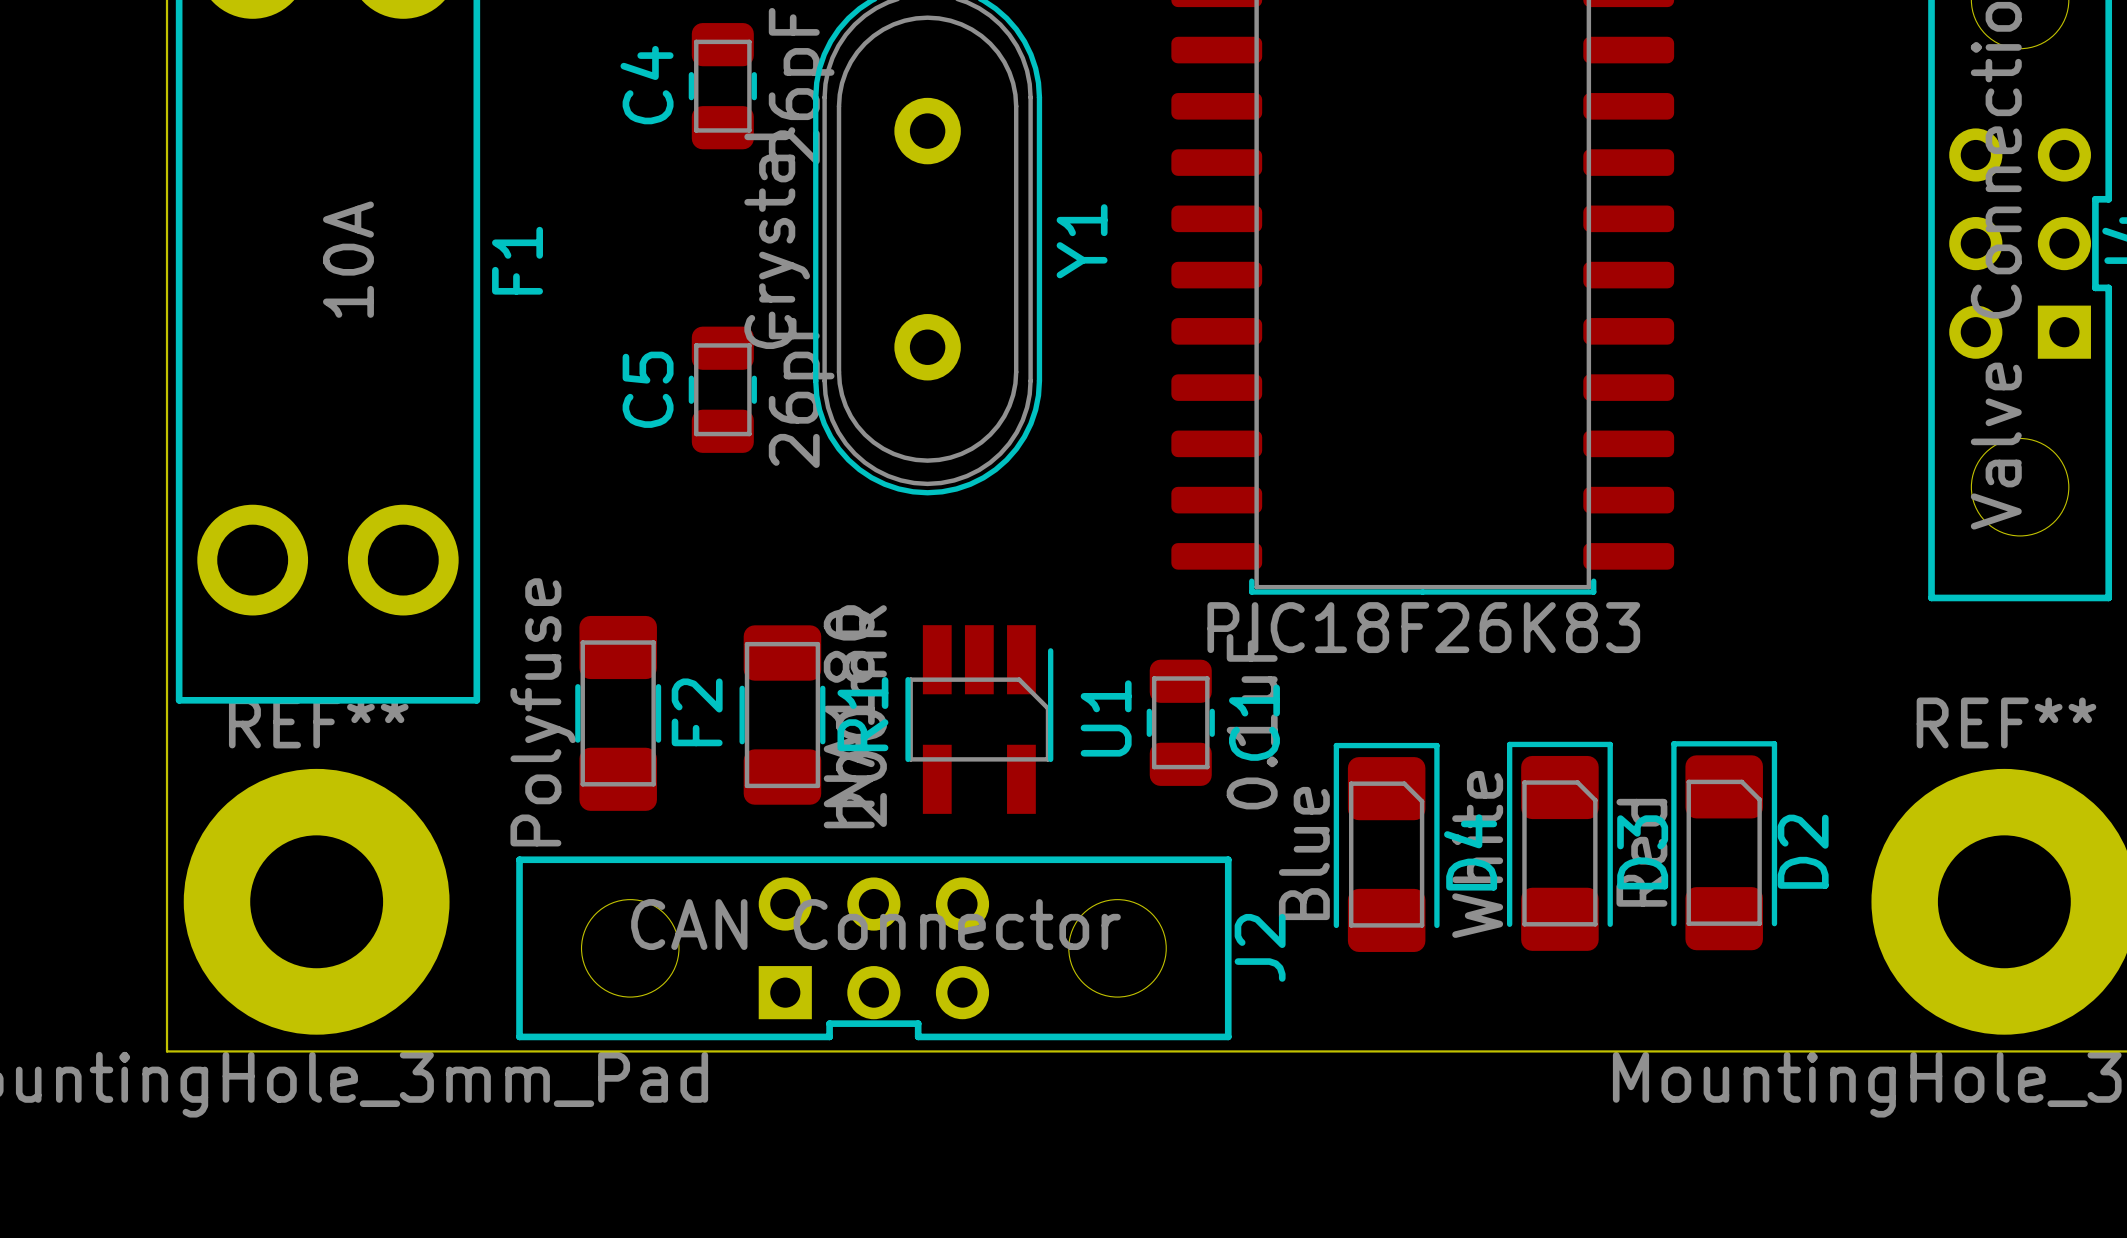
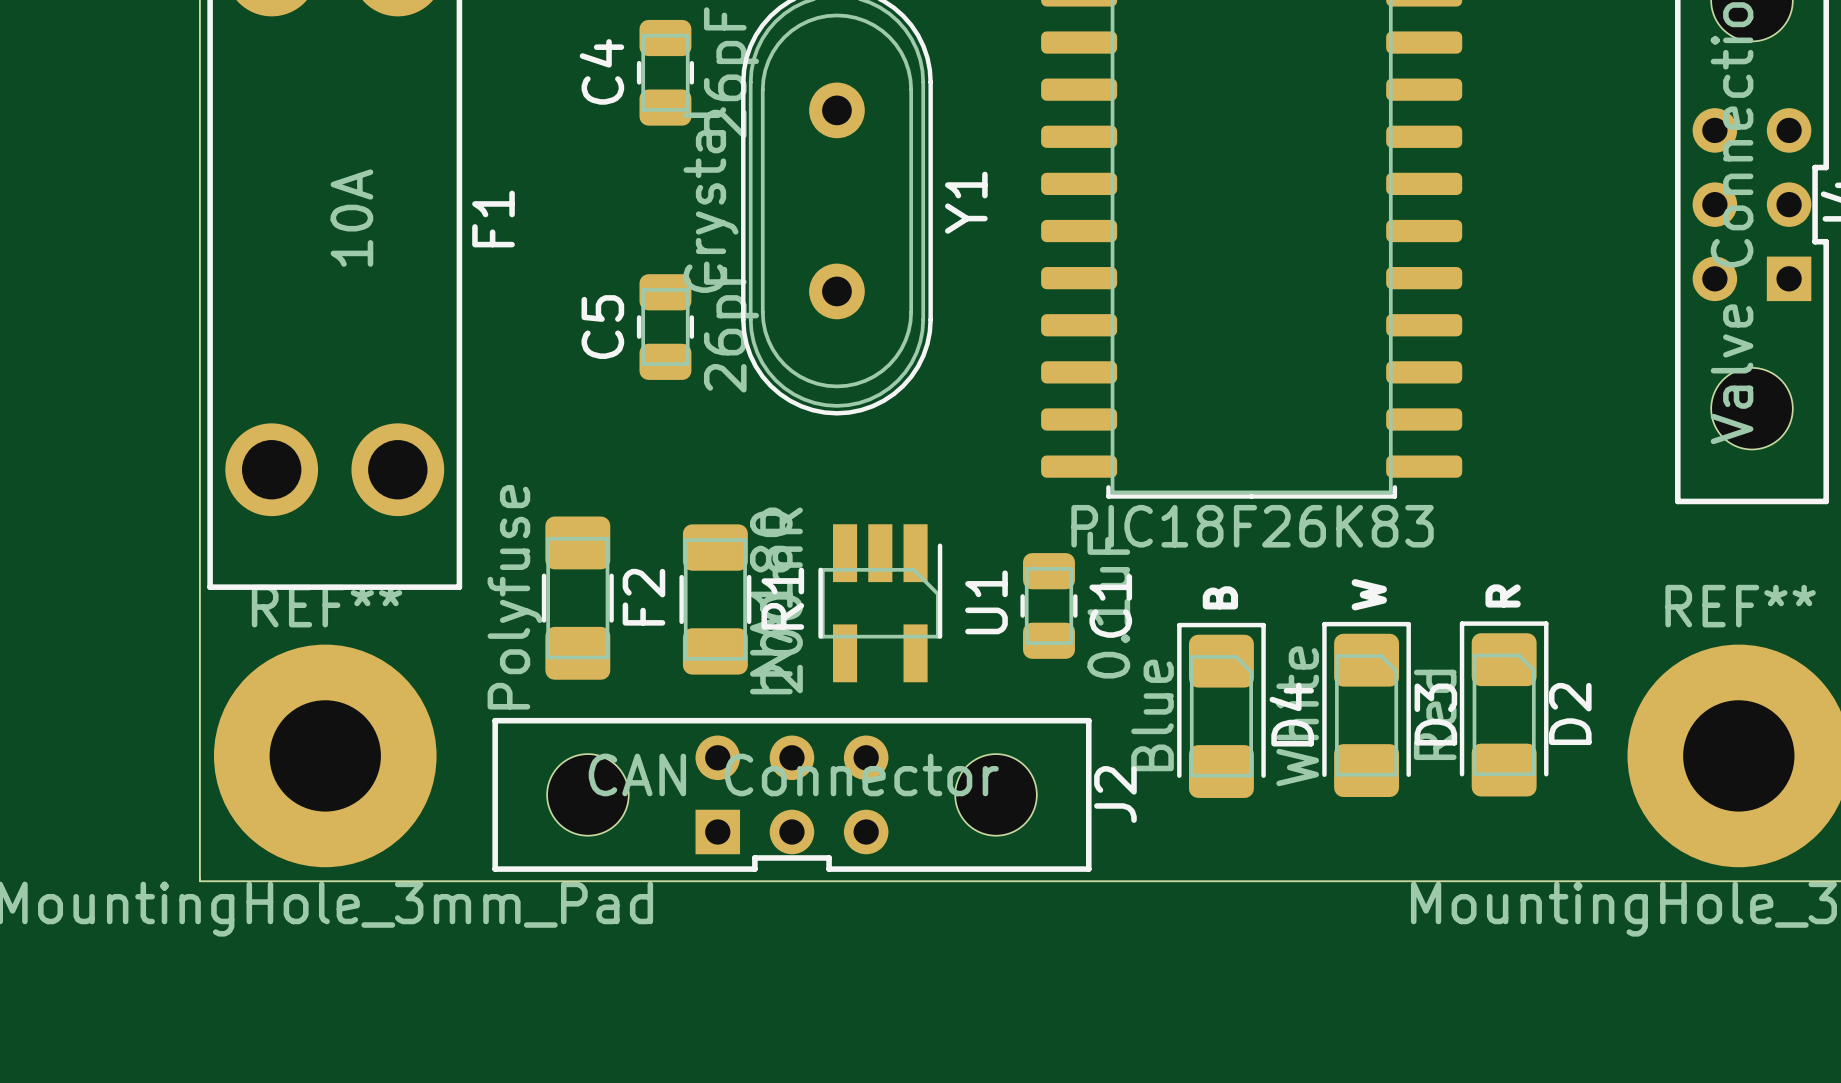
text: none -> W (1369, 594)
text: none -> R (1503, 595)
text: none -> B (1220, 597)

